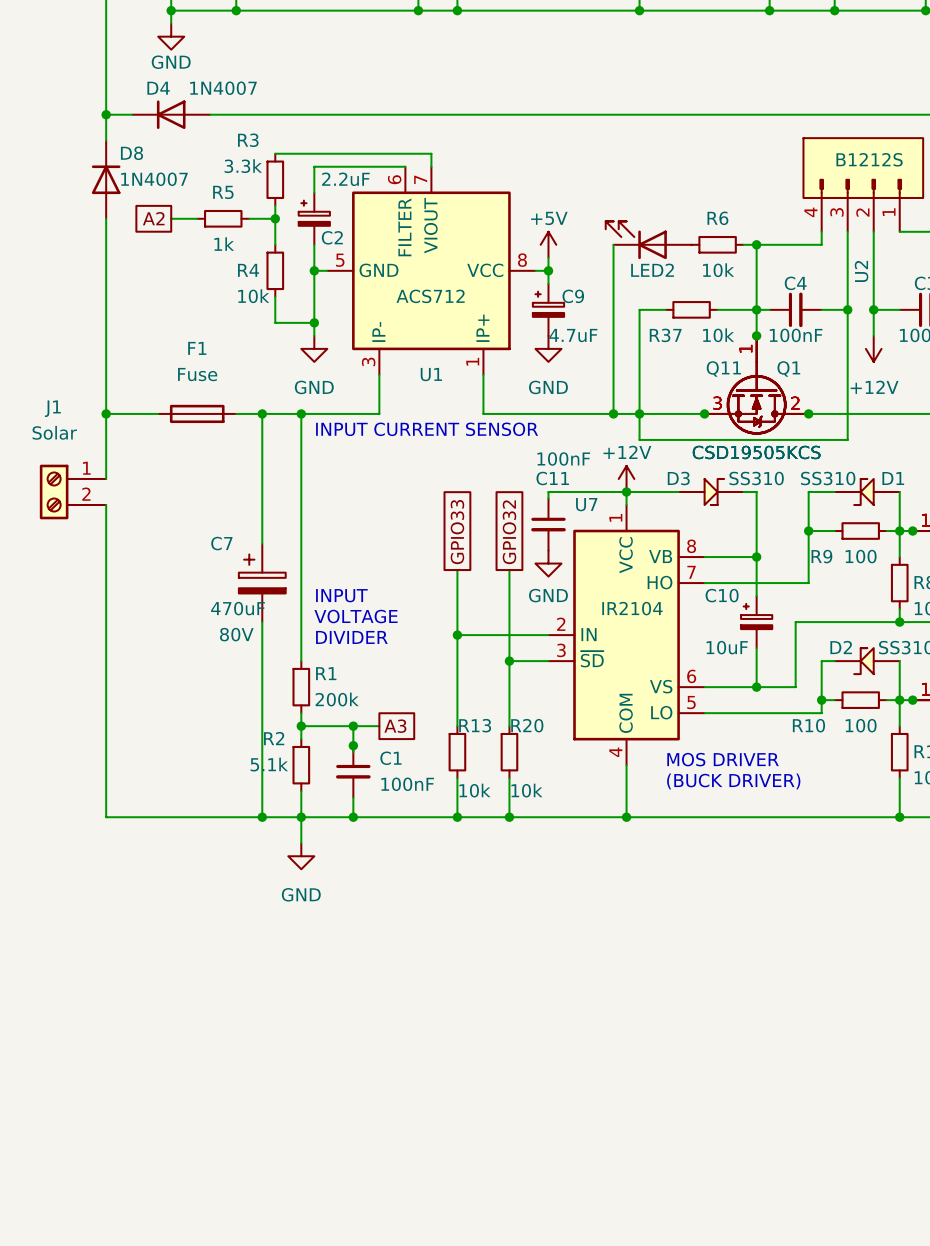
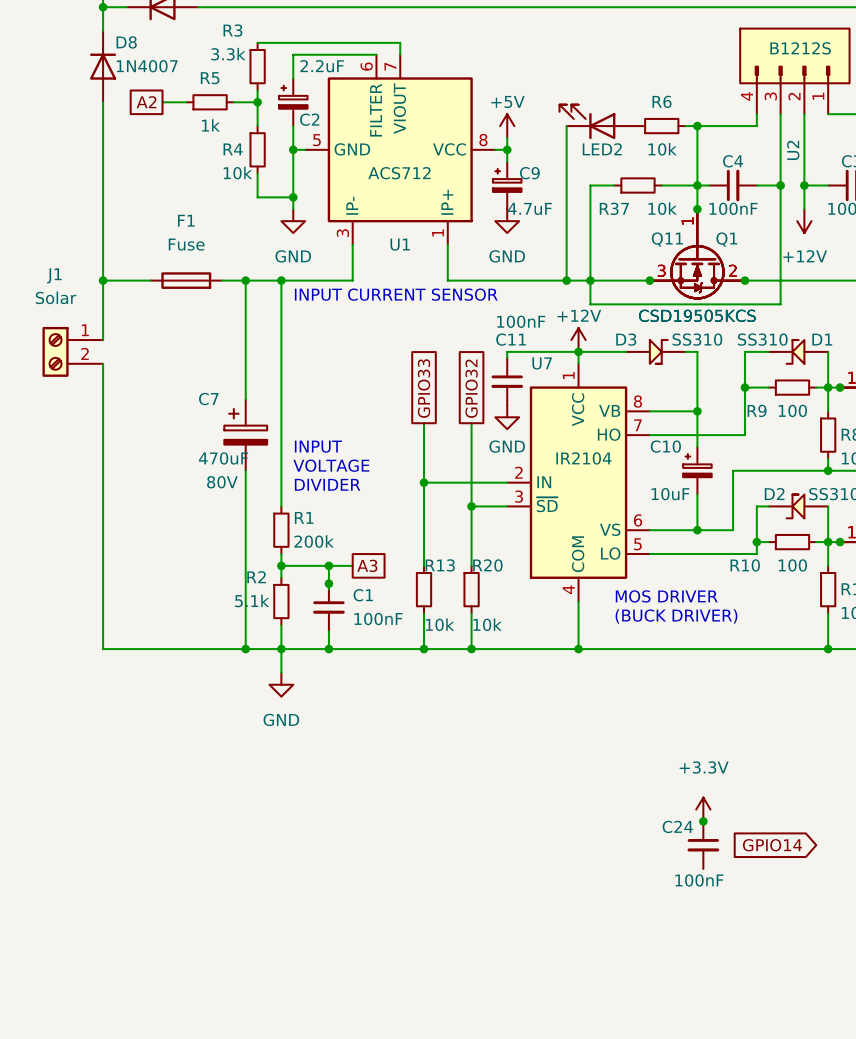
power symbol: none -> +3.3V (703, 809)
junction: none -> (703, 821)
C24: none -> 100nF (703, 845)
global label: none -> GPIO14 (772, 845)

